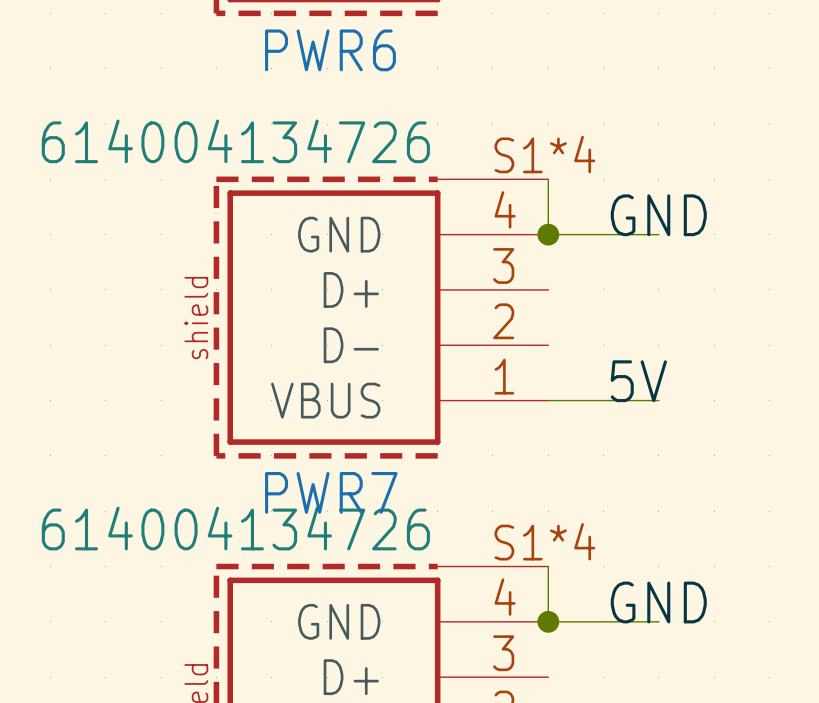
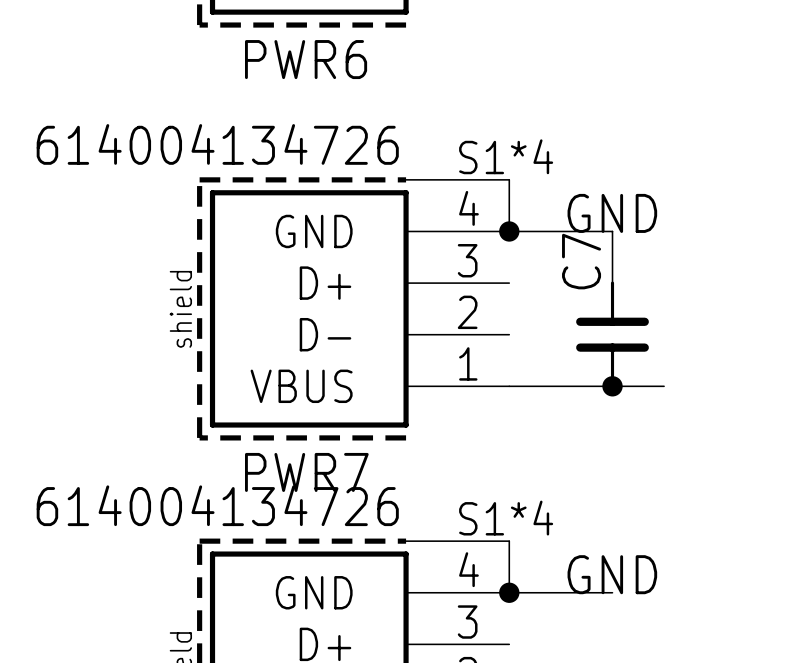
wire: none -> (612, 231) (612, 283)
C7: none -> (612, 334)
label: 5V (638, 381) -> none
wire: none -> (612, 386) (664, 386)
junction: none -> (612, 386)

